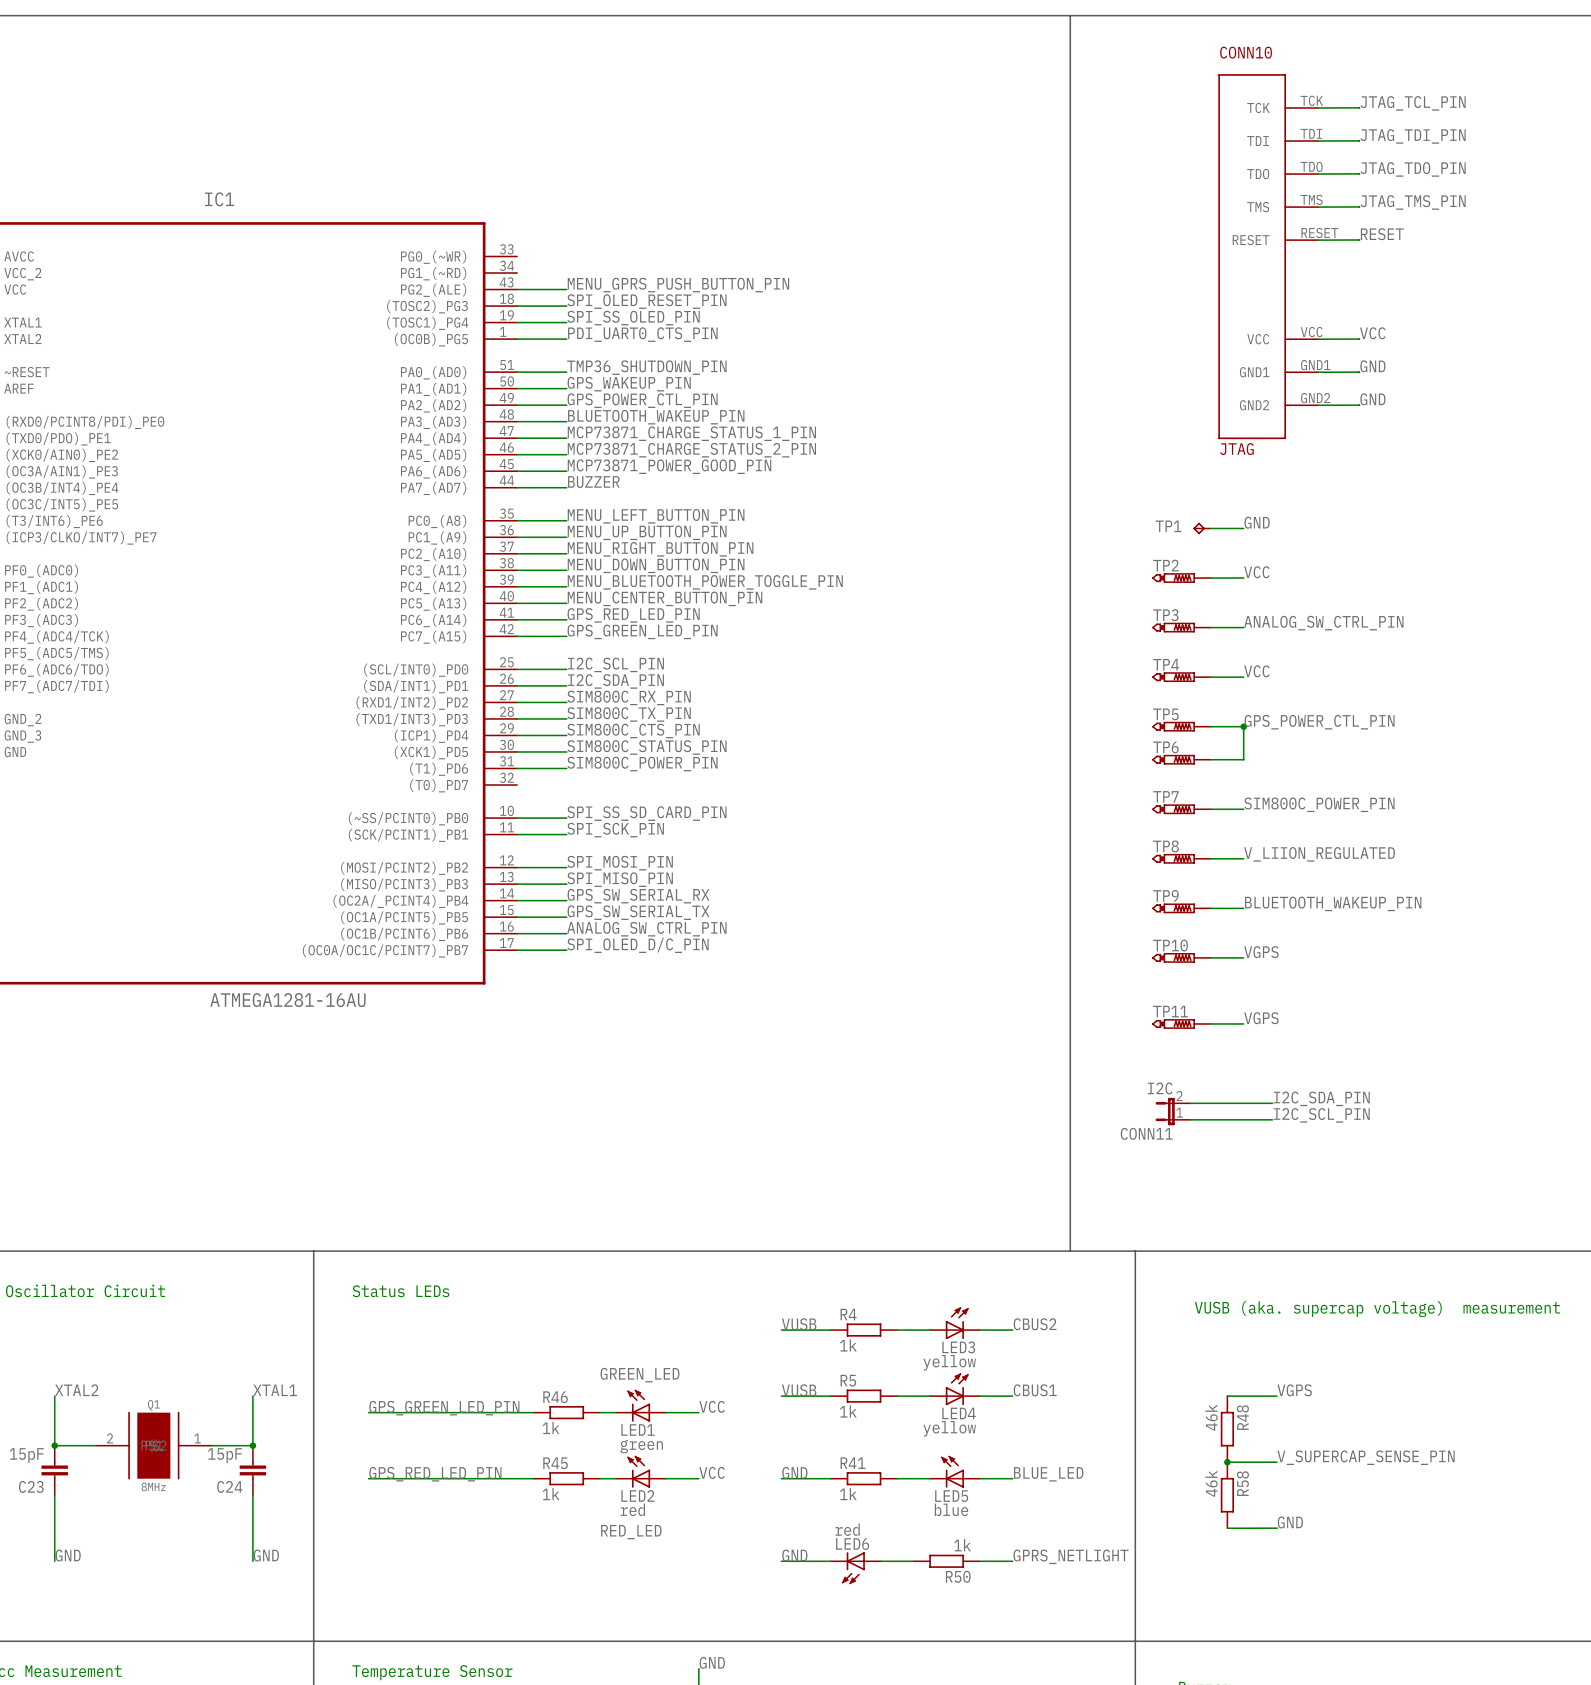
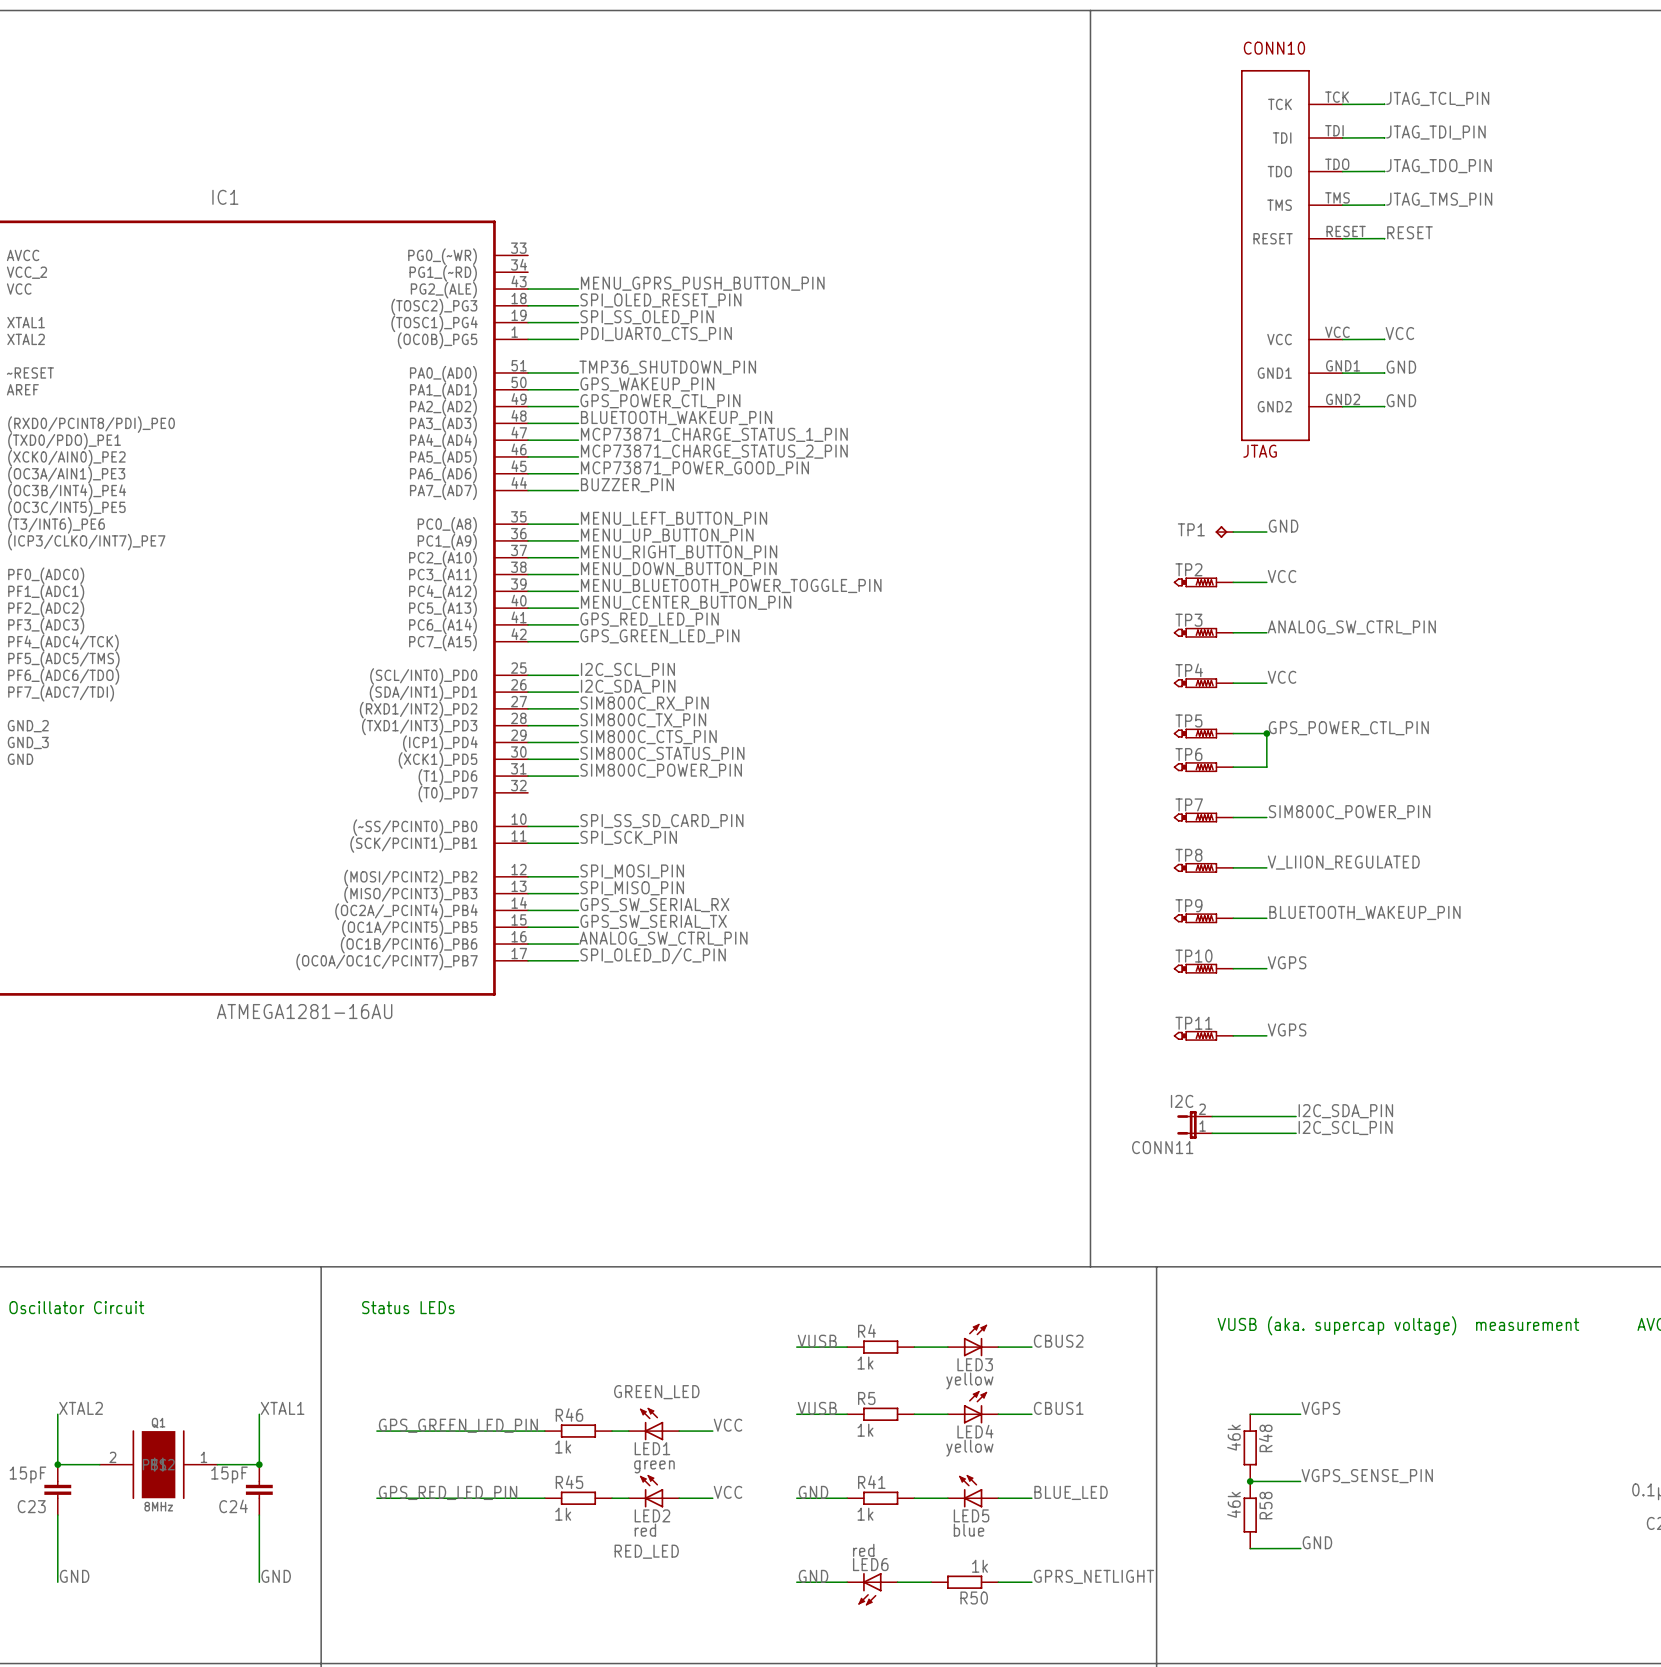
label: BUZZER (593, 482) -> BUZZER_PIN (627, 485)
label: V_SUPERCAP_SENSE_PIN (1366, 1457) -> VGPS_SENSE_PIN (1367, 1476)

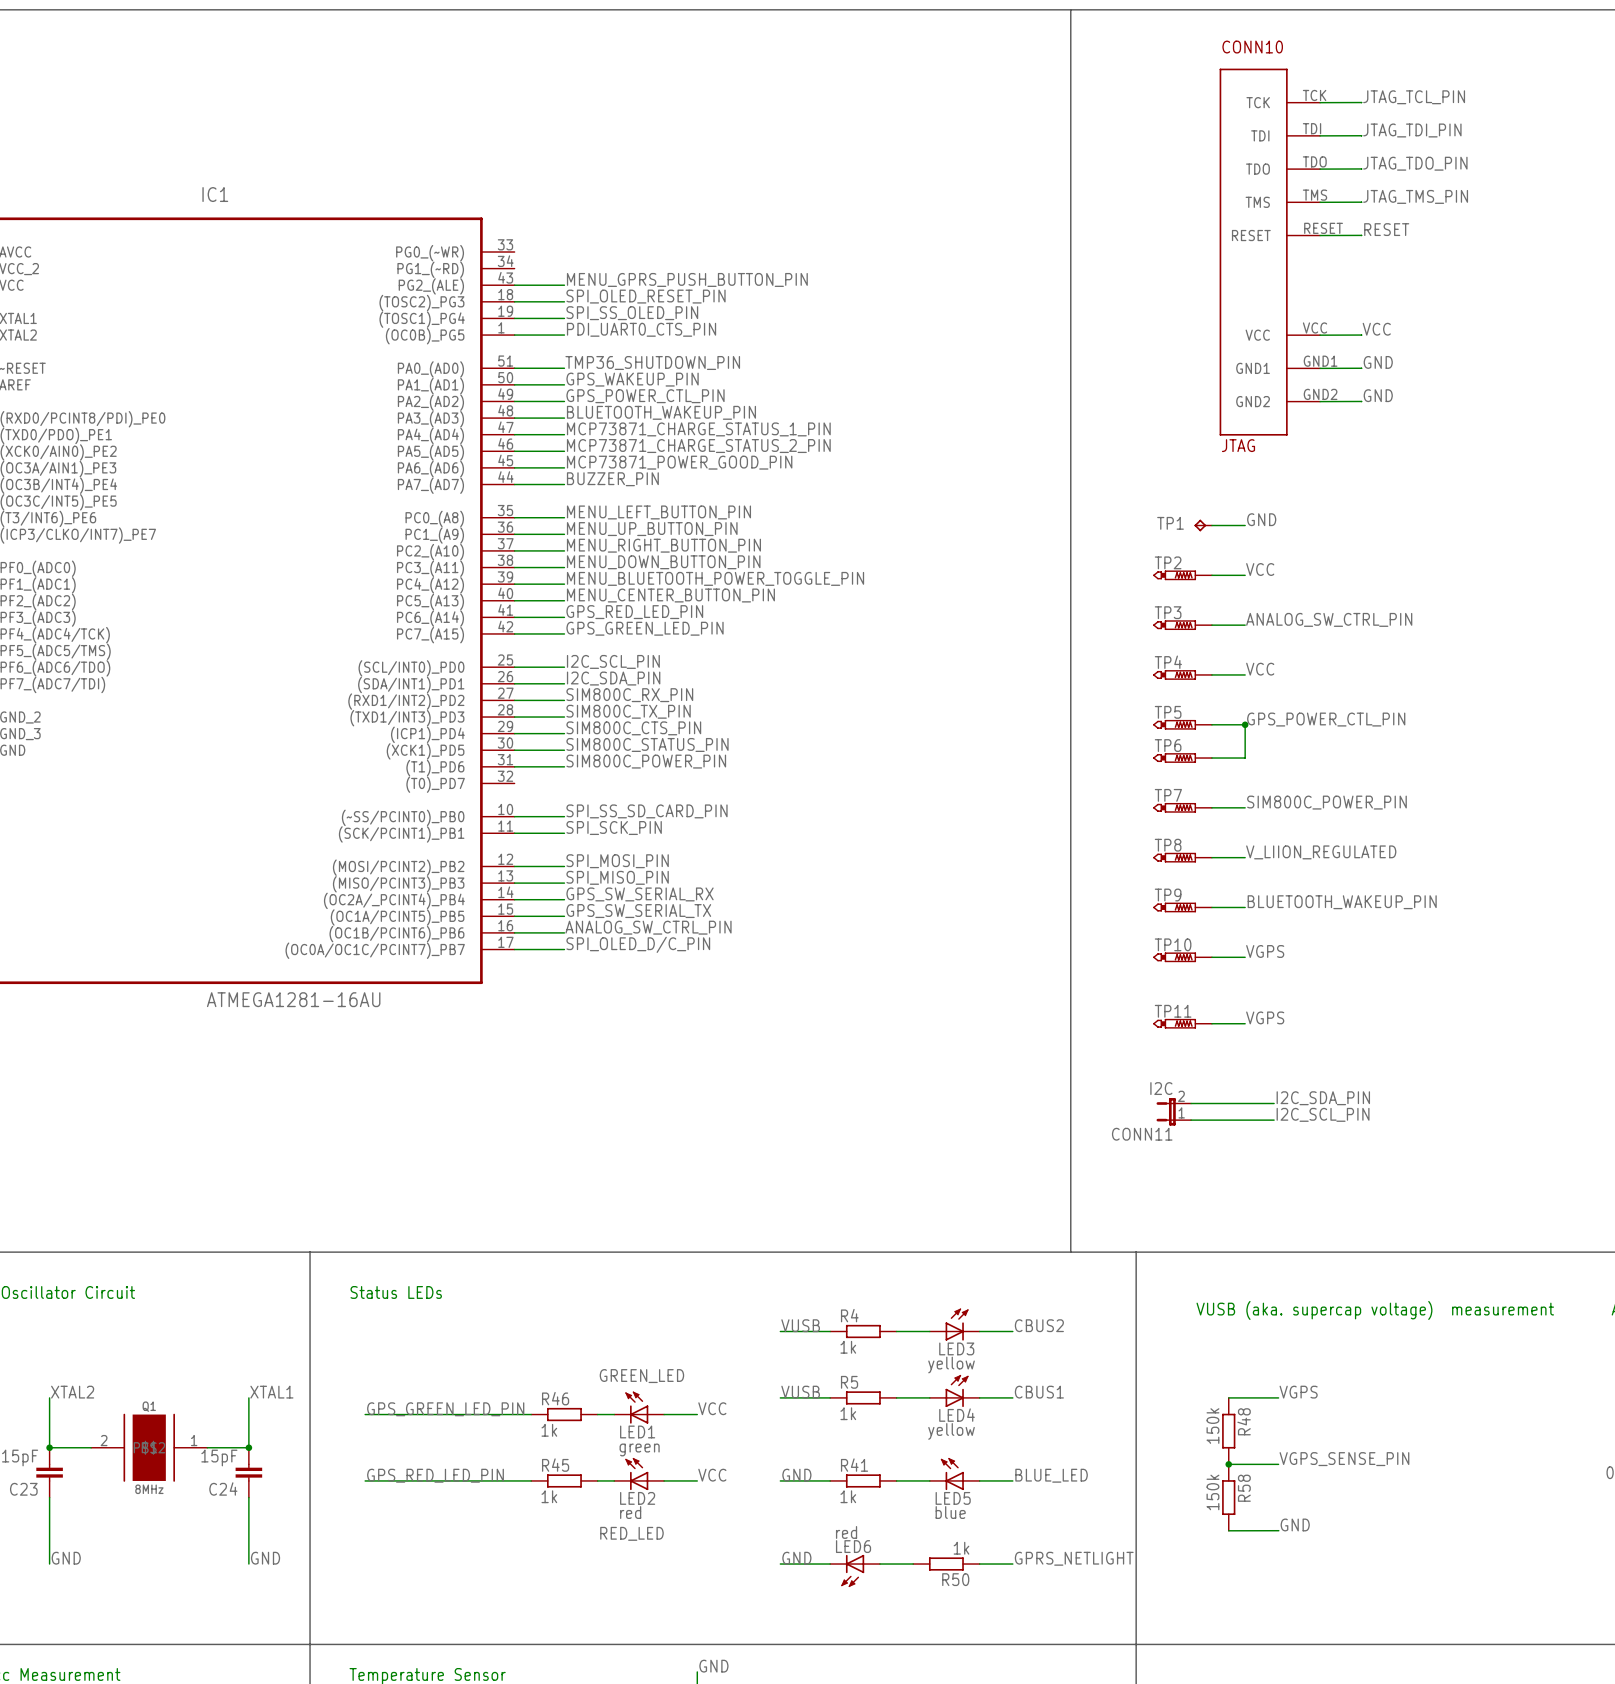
R48 value: 46k (1233, 1437) -> 150k (1212, 1426)
R58 value: 46k (1233, 1504) -> 150k (1212, 1492)

